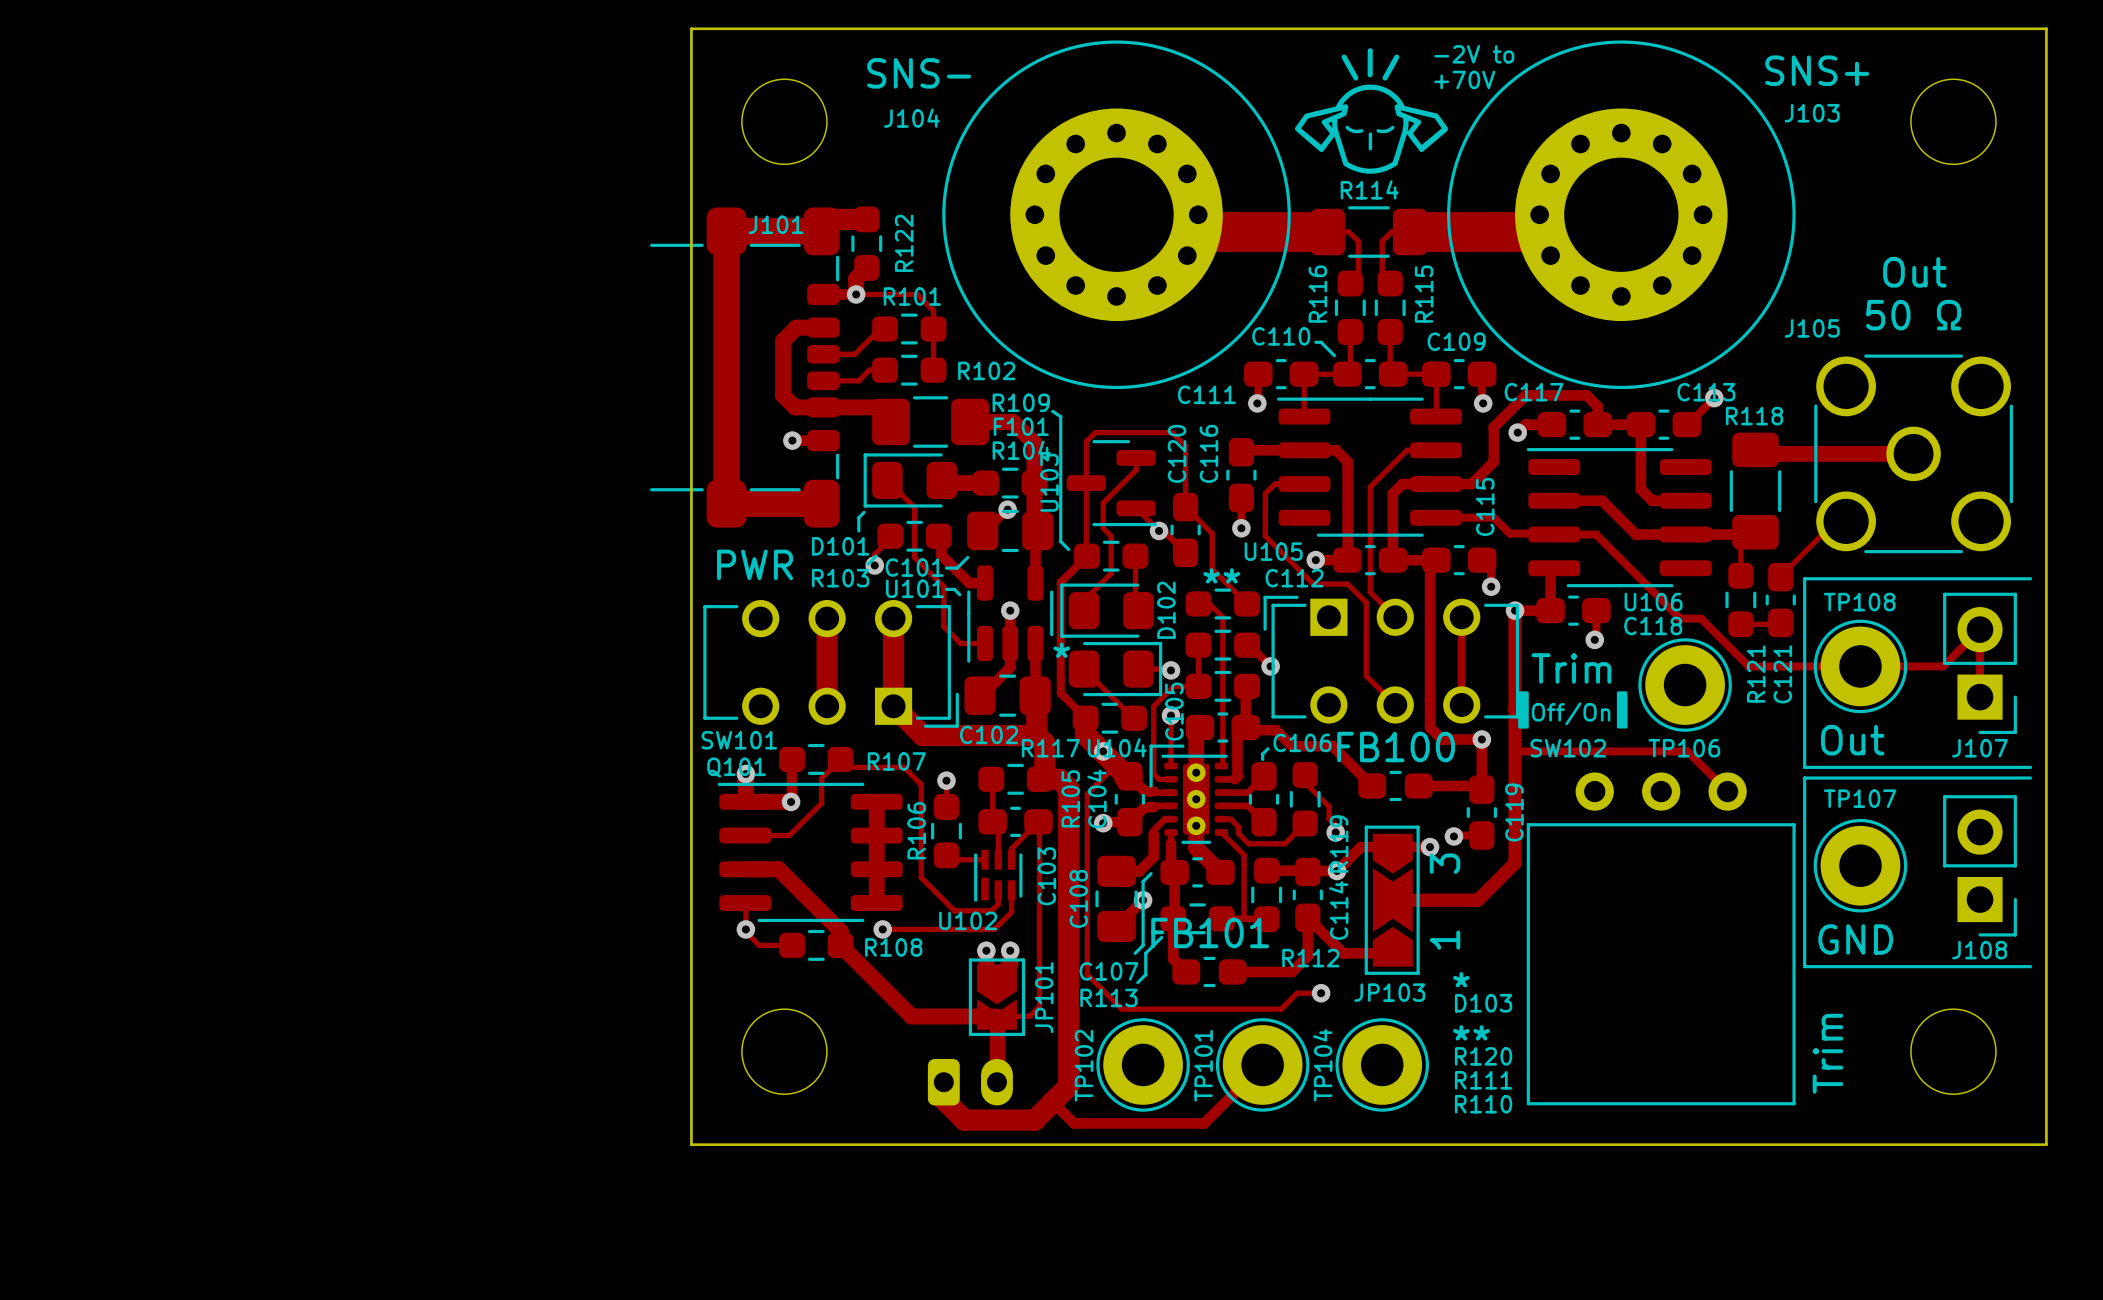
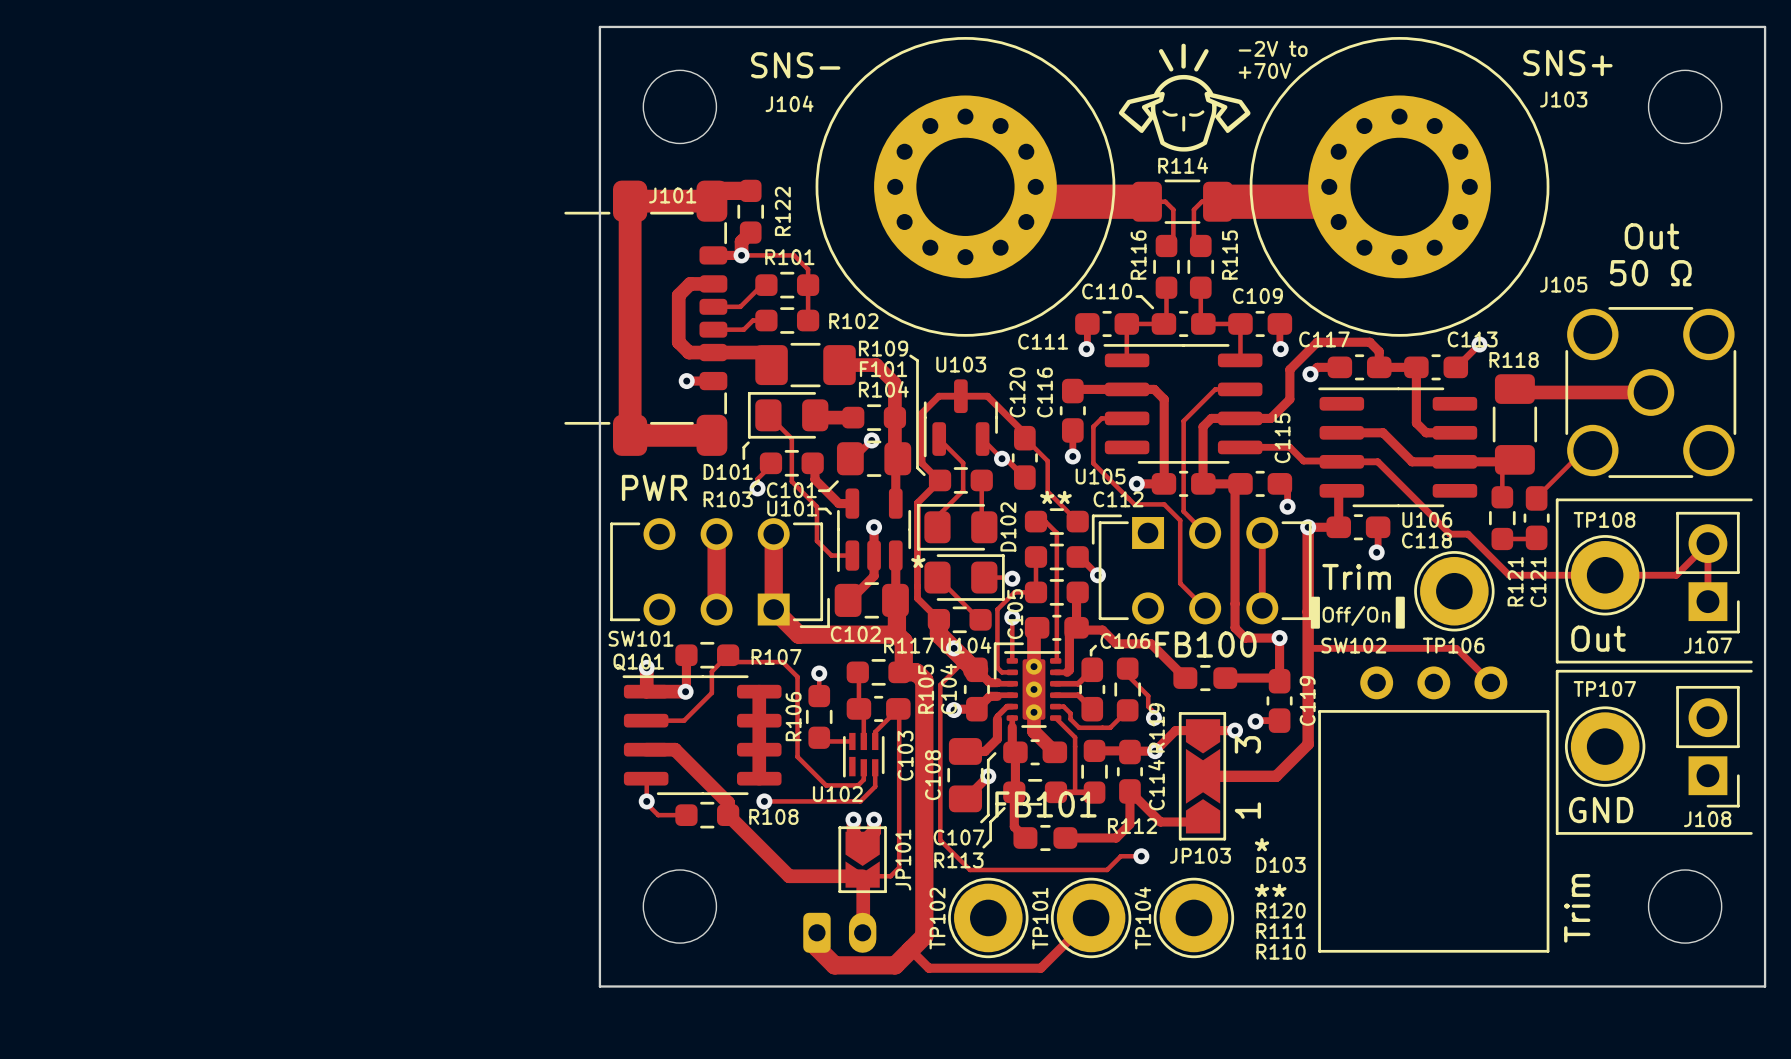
track: (1136, 457) (1136, 470) (1103, 503) (1103, 528) (1111, 536) (1111, 573) (1083, 600) -> (939, 439) (963, 463) (963, 490) (937, 516) (937, 518)
U103 rotation: 0° (1112, 483) -> 90° clockwise (960, 418)
track: (1185, 507) (1185, 445) (1172, 432) (1095, 432) (1086, 441) (1086, 556) -> (1024, 433) (987, 396) (938, 396) (922, 413) (922, 463) (939, 480)

